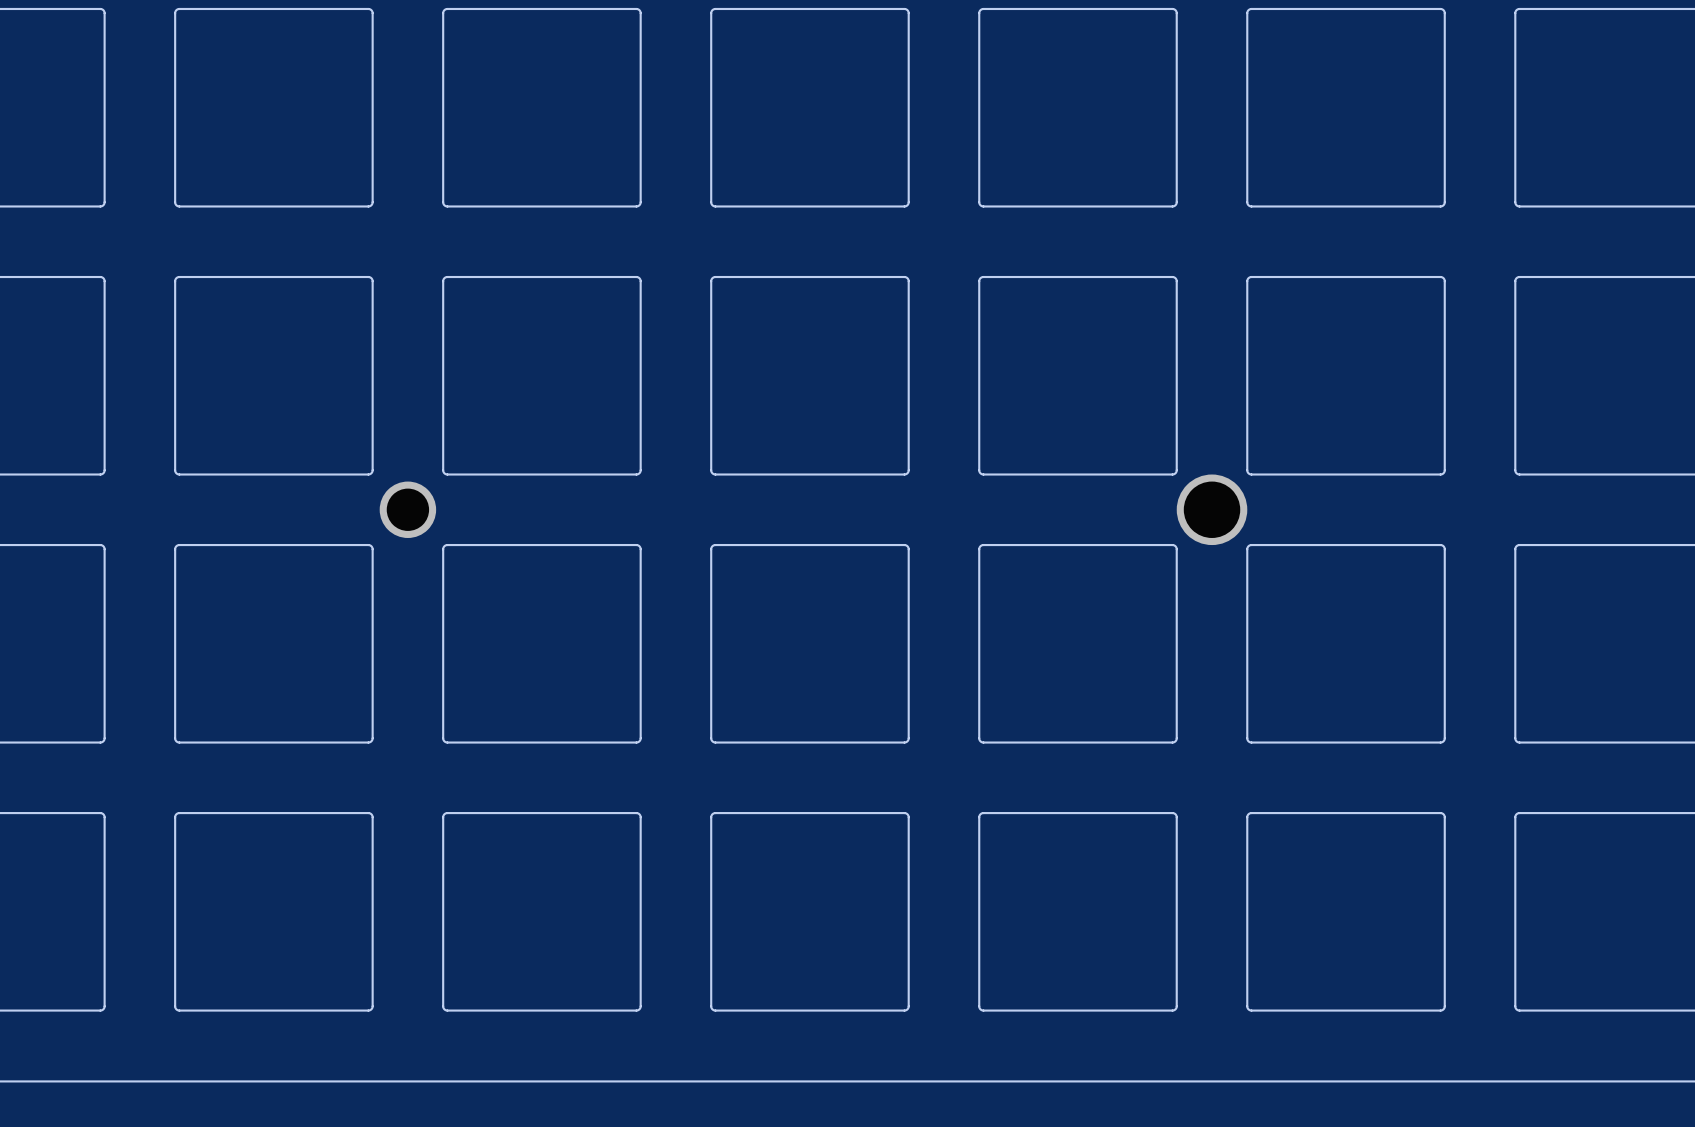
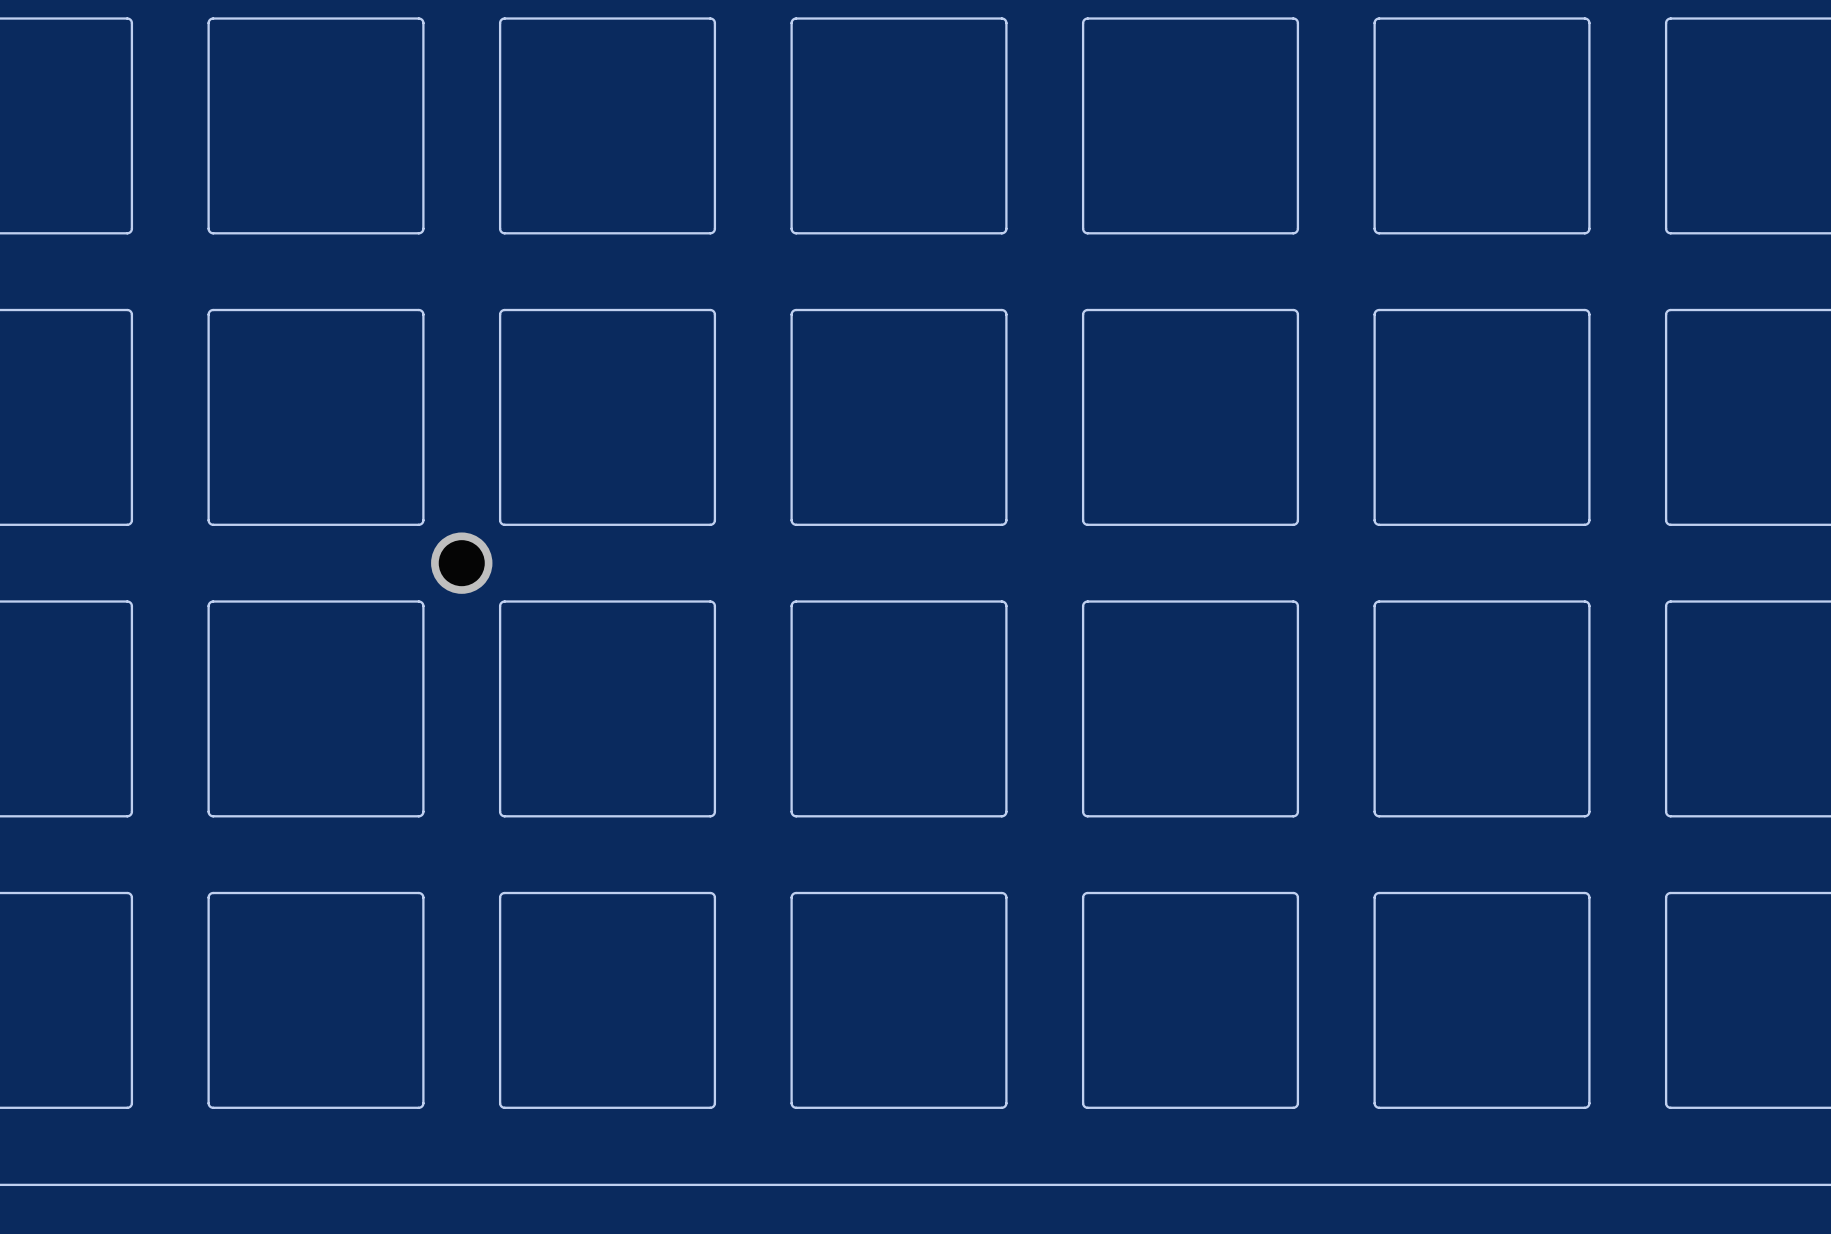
via: (1212, 509) -> none

